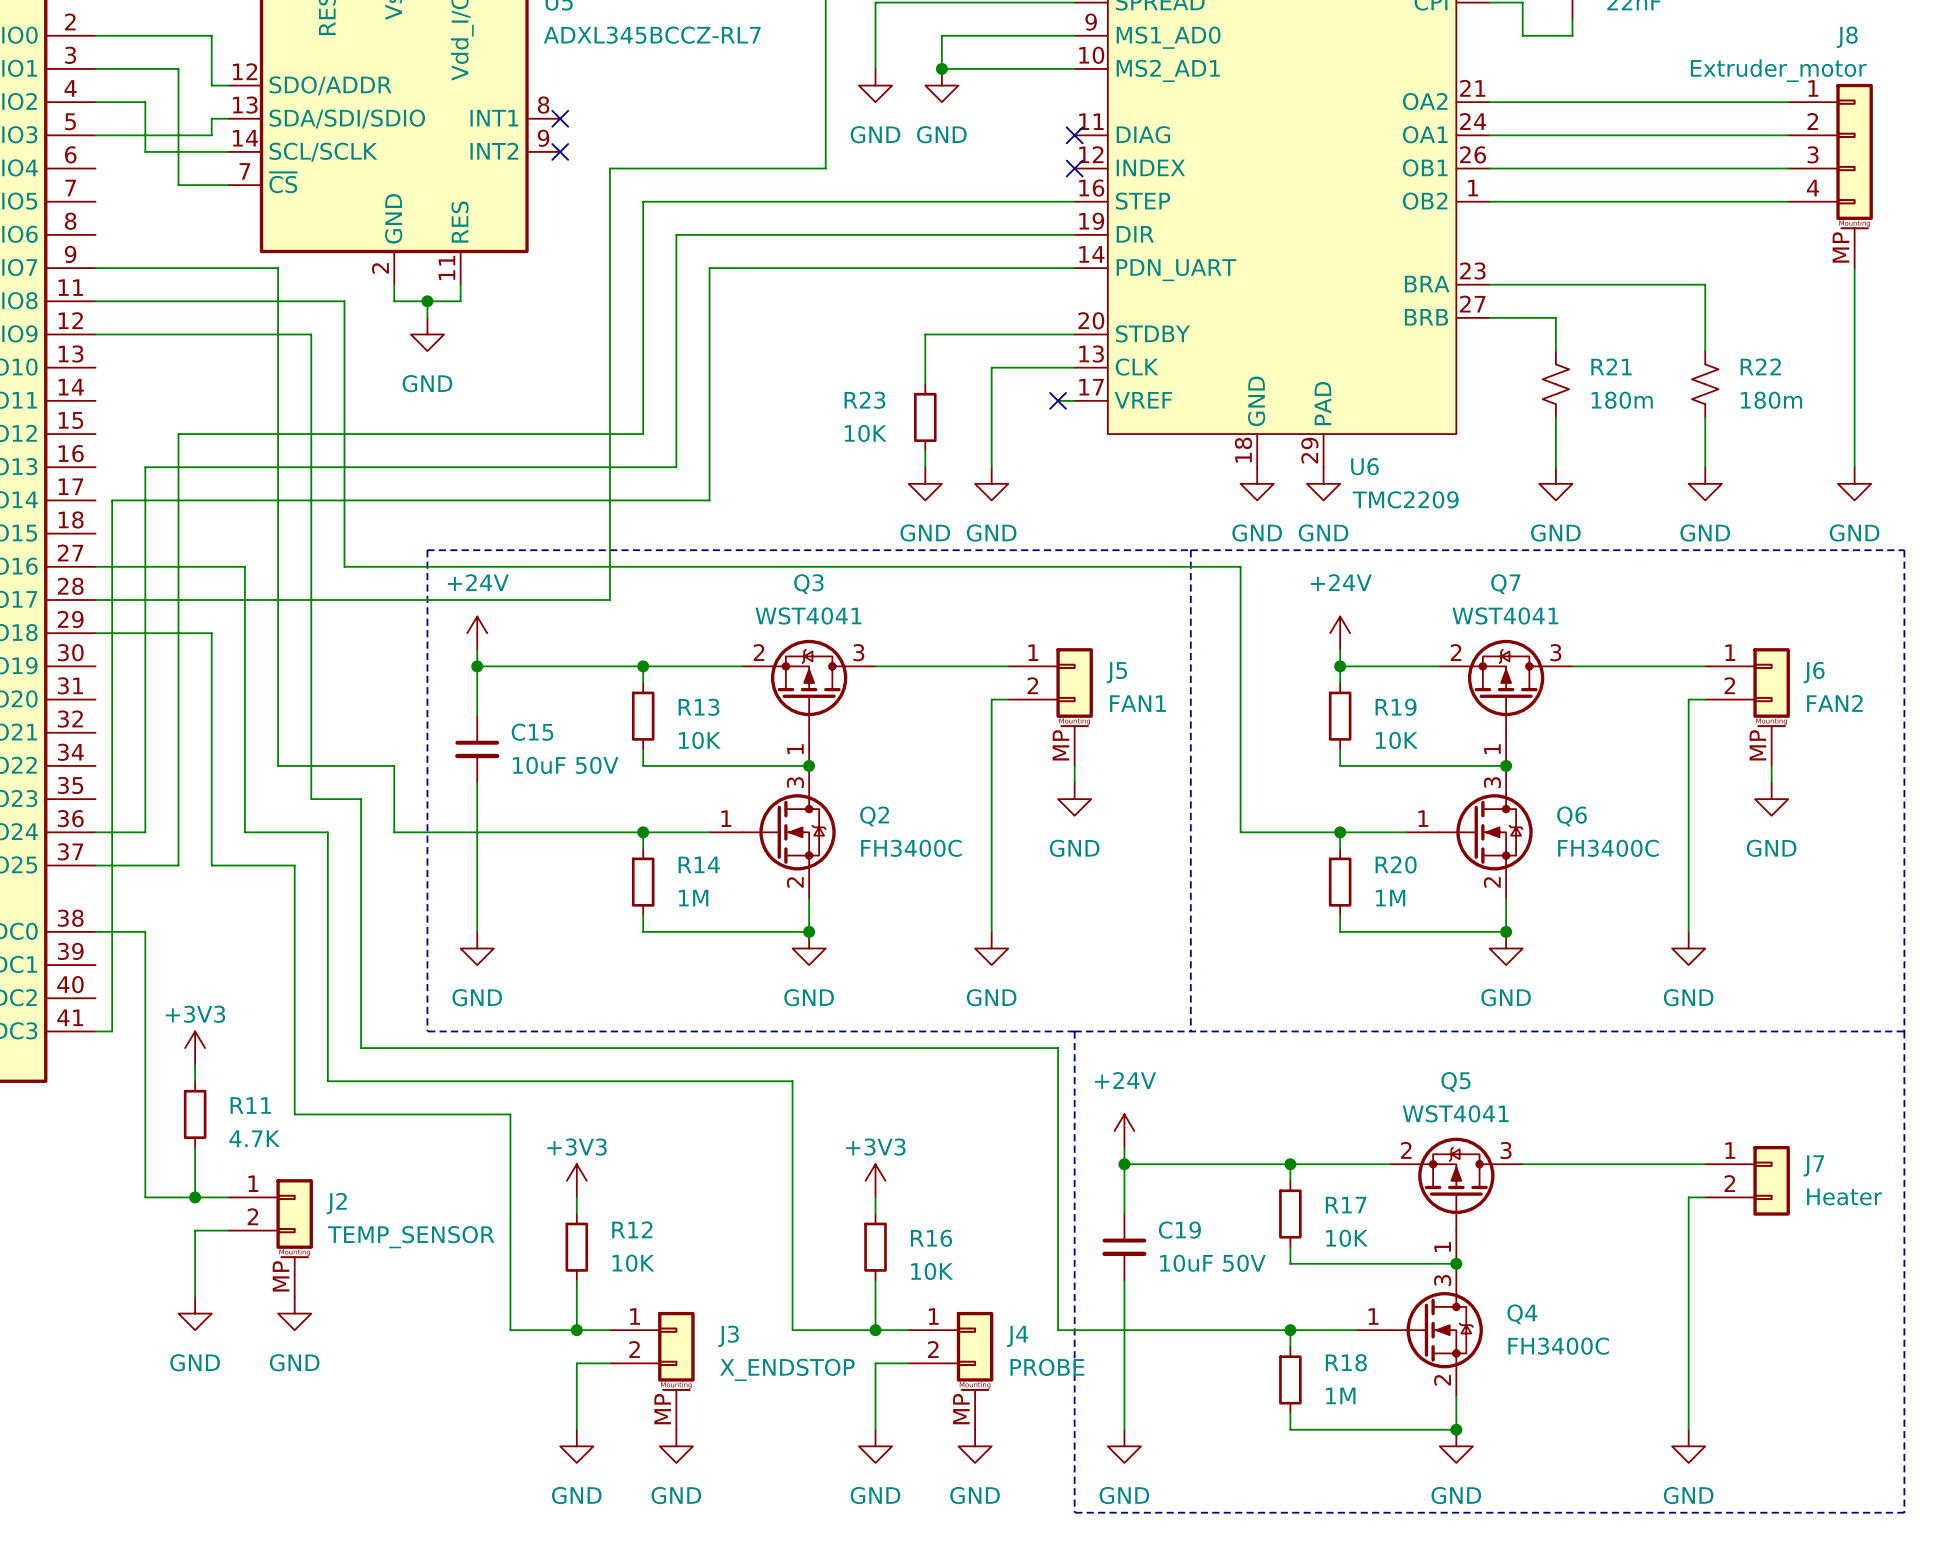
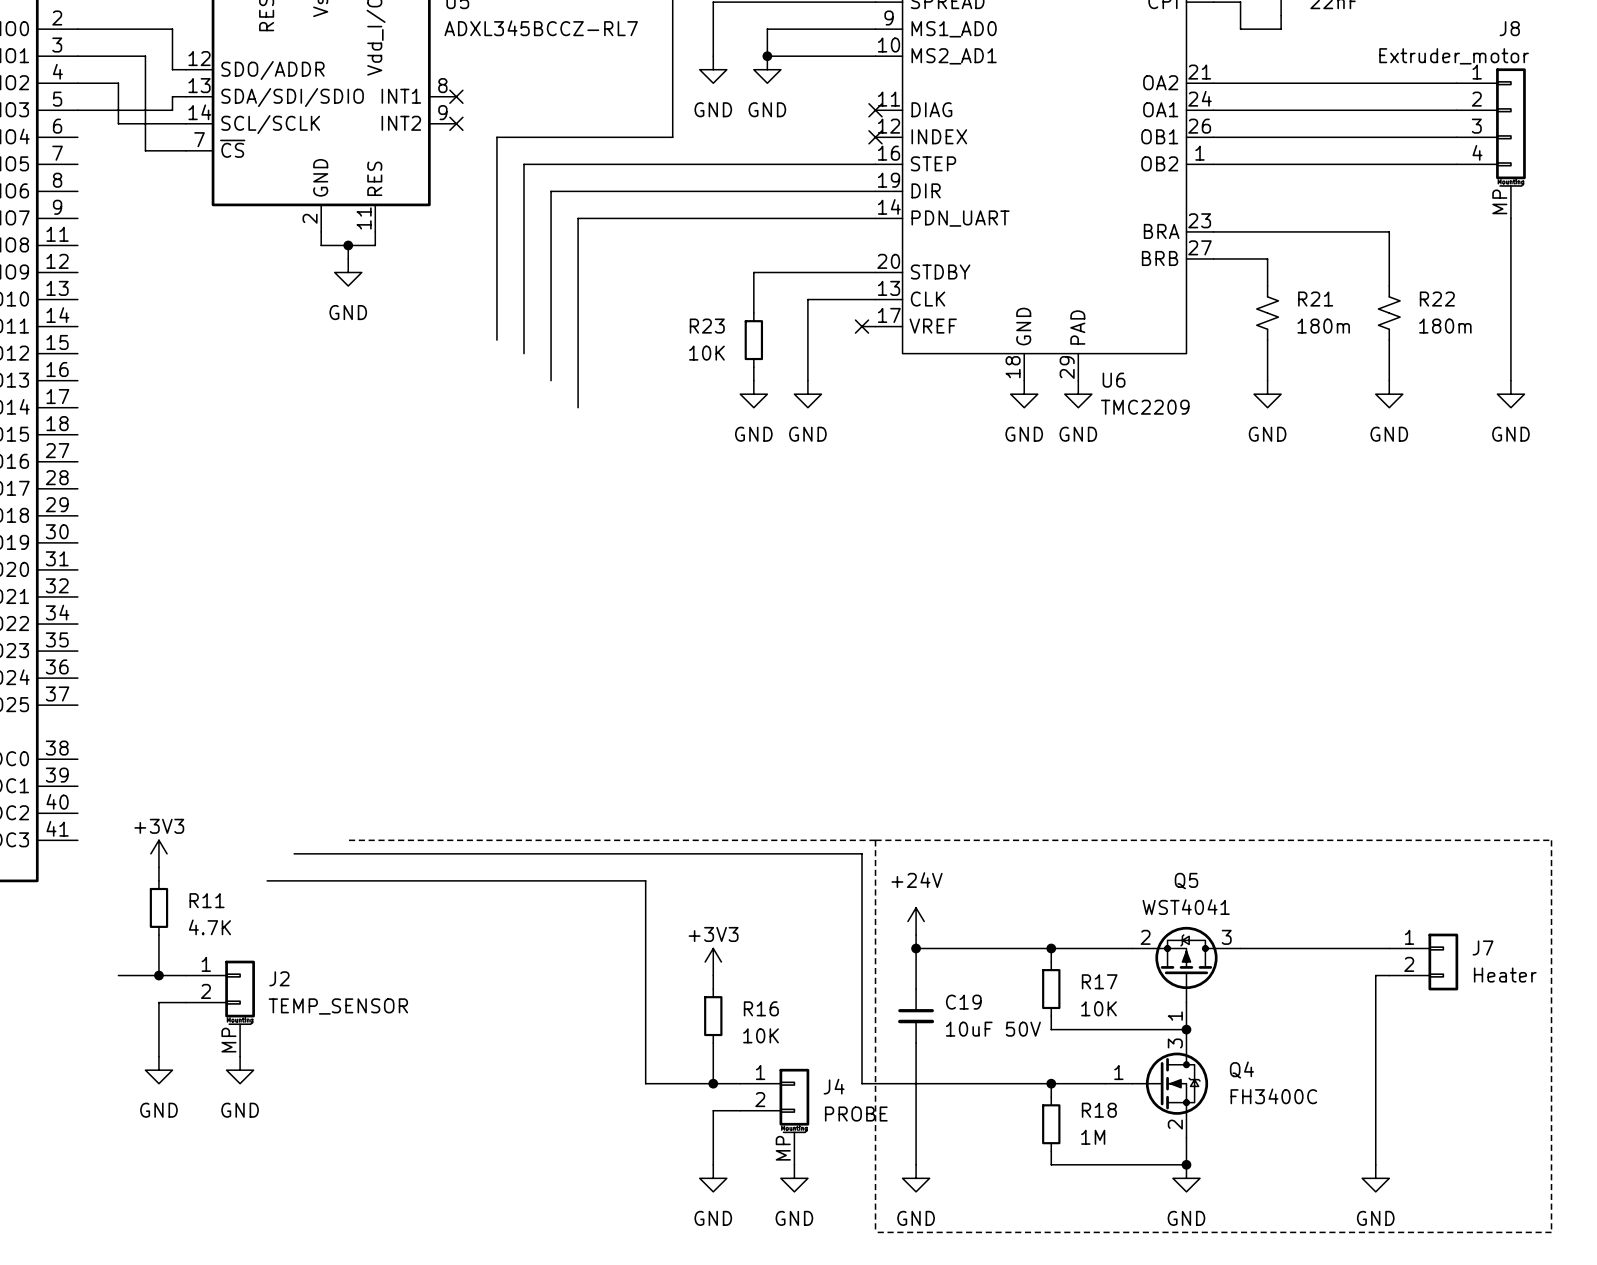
wire: (95, 268) (278, 268) (278, 765) (394, 765) (394, 832) (709, 832) -> none
wire: (95, 301) (344, 301) (344, 566) (1240, 566) (1240, 832) (1406, 832) -> none
wire: (95, 334) (311, 334) (311, 799) (361, 799) (361, 1048) -> none
wire: (609, 417) (609, 600) (95, 600) -> none
wire: (643, 434) (178, 434) (178, 865) (95, 865) -> none
wire: (676, 467) (145, 467) (145, 832) (95, 832) -> none
wire: (709, 500) (112, 500) (112, 1031) (95, 1031) -> none
line: (1190, 550) (1190, 1031) -> none
wire: (95, 566) (244, 566) (244, 832) (327, 832) (327, 1081) -> none
wire: (95, 633) (211, 633) (211, 865) (294, 865) (294, 1114) (510, 1114) (510, 1330) (609, 1330) -> none
power symbol: +24V (477, 633) -> none
power symbol: +24V (1340, 633) -> none
wire: (477, 649) (477, 716) -> none
wire: (1340, 649) (1340, 682) -> none
wire: (477, 666) (742, 666) -> none
junction: (477, 666) -> none
wire: (643, 666) (643, 682) -> none
junction: (643, 666) -> none
wire: (875, 666) (1008, 666) -> none
wire: (1340, 666) (1439, 666) -> none
junction: (1340, 666) -> none
wire: (1572, 666) (1705, 666) -> none
wire: (1008, 699) (991, 699) (991, 931) -> none
wire: (1705, 699) (1688, 699) (1688, 931) -> none
Q3: WST4041 (809, 702) -> none
Q7: WST4041 (1506, 702) -> none
J5: FAN1 (1050, 707) -> none
J6: FAN2 (1747, 707) -> none
R13: 10K (643, 716) -> none
R19: 10K (1340, 716) -> none
C15: 10uF 50V (477, 749) -> none
wire: (643, 749) (643, 765) (809, 765) -> none
wire: (1340, 749) (1340, 765) (1506, 765) -> none
junction: (809, 765) -> none
wire: (1074, 765) (1074, 782) -> none
junction: (1506, 765) -> none
wire: (1771, 765) (1771, 782) -> none
wire: (477, 782) (477, 931) -> none
power symbol: GND (1074, 799) -> none
power symbol: GND (1771, 799) -> none
wire: (643, 832) (643, 848) -> none
junction: (643, 832) -> none
Q2: FH3400C (772, 832) -> none
wire: (1340, 832) (1340, 848) -> none
junction: (1340, 832) -> none
Q6: FH3400C (1469, 832) -> none
R14: 1M (643, 882) -> none
R20: 1M (1340, 882) -> none
wire: (809, 898) (809, 931) (643, 931) (643, 915) -> none
wire: (1506, 898) (1506, 931) (1340, 931) (1340, 915) -> none
wire: (95, 931) (145, 931) (145, 1197) -> none
junction: (809, 931) -> none
junction: (1506, 931) -> none
power symbol: GND (477, 948) -> none
power symbol: GND (809, 948) -> none
power symbol: GND (991, 948) -> none
power symbol: GND (1506, 948) -> none
power symbol: GND (1688, 948) -> none
line: (427, 1031) (427, 550) (1904, 550) (1904, 1031) -> none
power symbol: +3V3 (576, 1180) -> none
wire: (576, 1197) (576, 1214) -> none
R12: 10K (576, 1247) -> none
wire: (576, 1280) (576, 1330) -> none
junction: (576, 1330) -> none
wire: (609, 1363) (576, 1363) (576, 1429) -> none
J3: X_ENDSTOP (652, 1370) -> none
power symbol: GND (576, 1446) -> none
power symbol: GND (676, 1446) -> none

